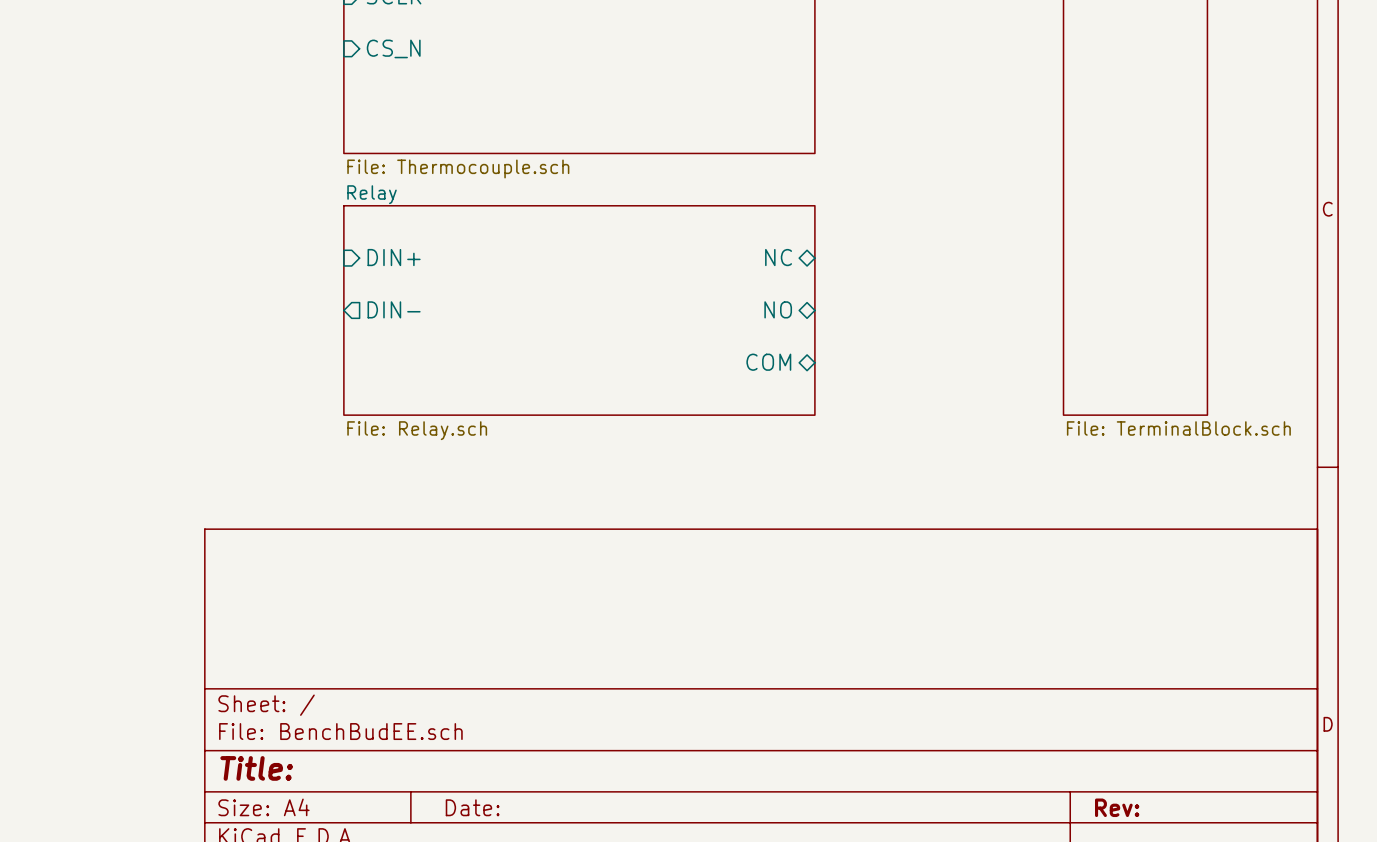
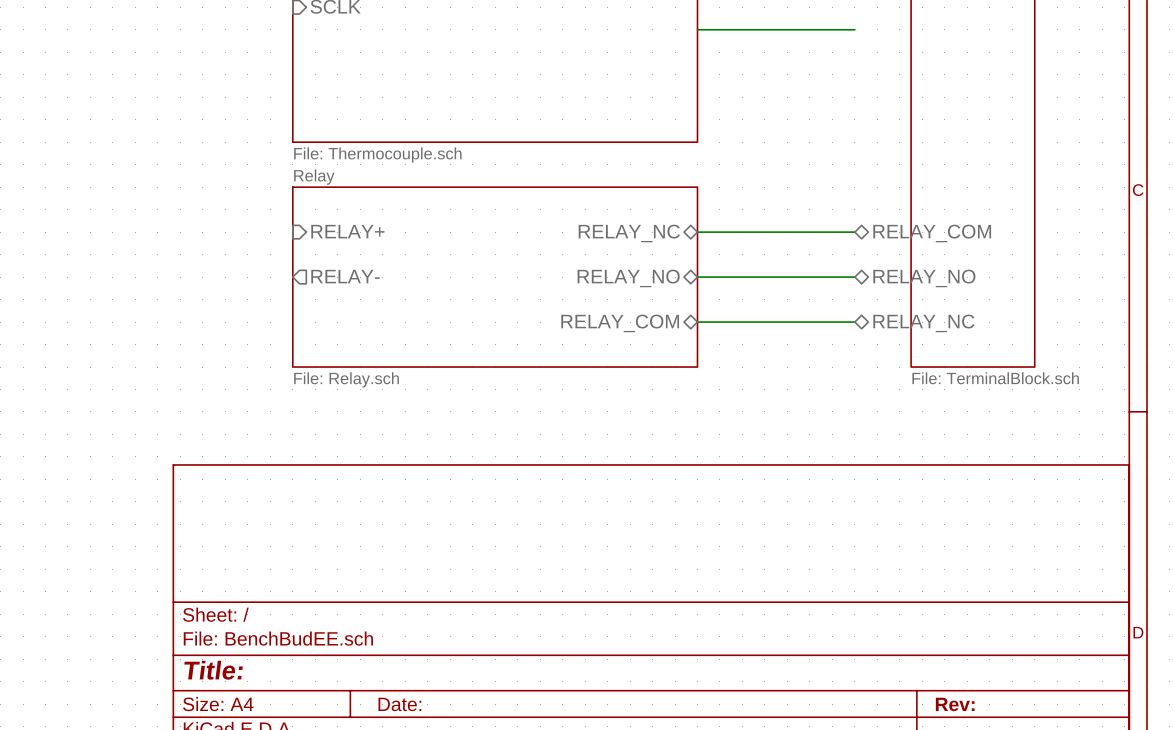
wire: none -> (697, 29) (854, 29)
sheet pin: CS_N (393, 48) -> none
sheet pin: DIN+ (394, 257) -> RELAY+ (347, 231)
sheet pin: NC (778, 257) -> RELAY_NC (629, 233)
wire: none -> (697, 232) (854, 232)
sheet pin: none -> RELAY_COM (932, 233)
sheet pin: DIN- (394, 309) -> RELAY- (345, 276)
sheet pin: NO (778, 309) -> RELAY_NO (628, 278)
wire: none -> (697, 277) (854, 277)
sheet pin: none -> RELAY_NO (924, 278)
sheet pin: COM (768, 362) -> RELAY_COM (620, 323)
wire: none -> (697, 322) (854, 322)
sheet pin: none -> RELAY_NC (923, 323)

